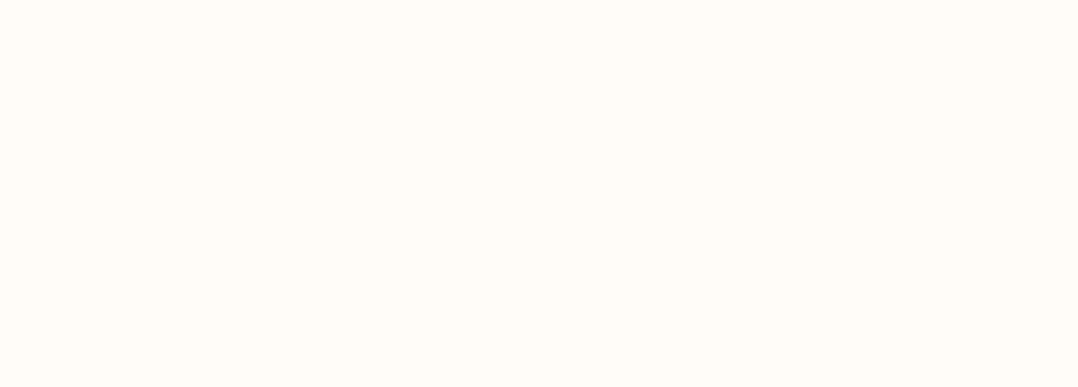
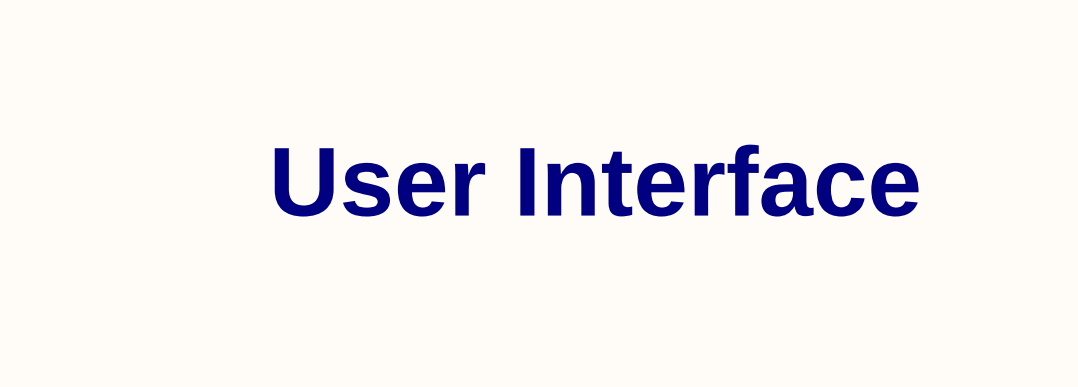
text: none -> User Interface (596, 180)

